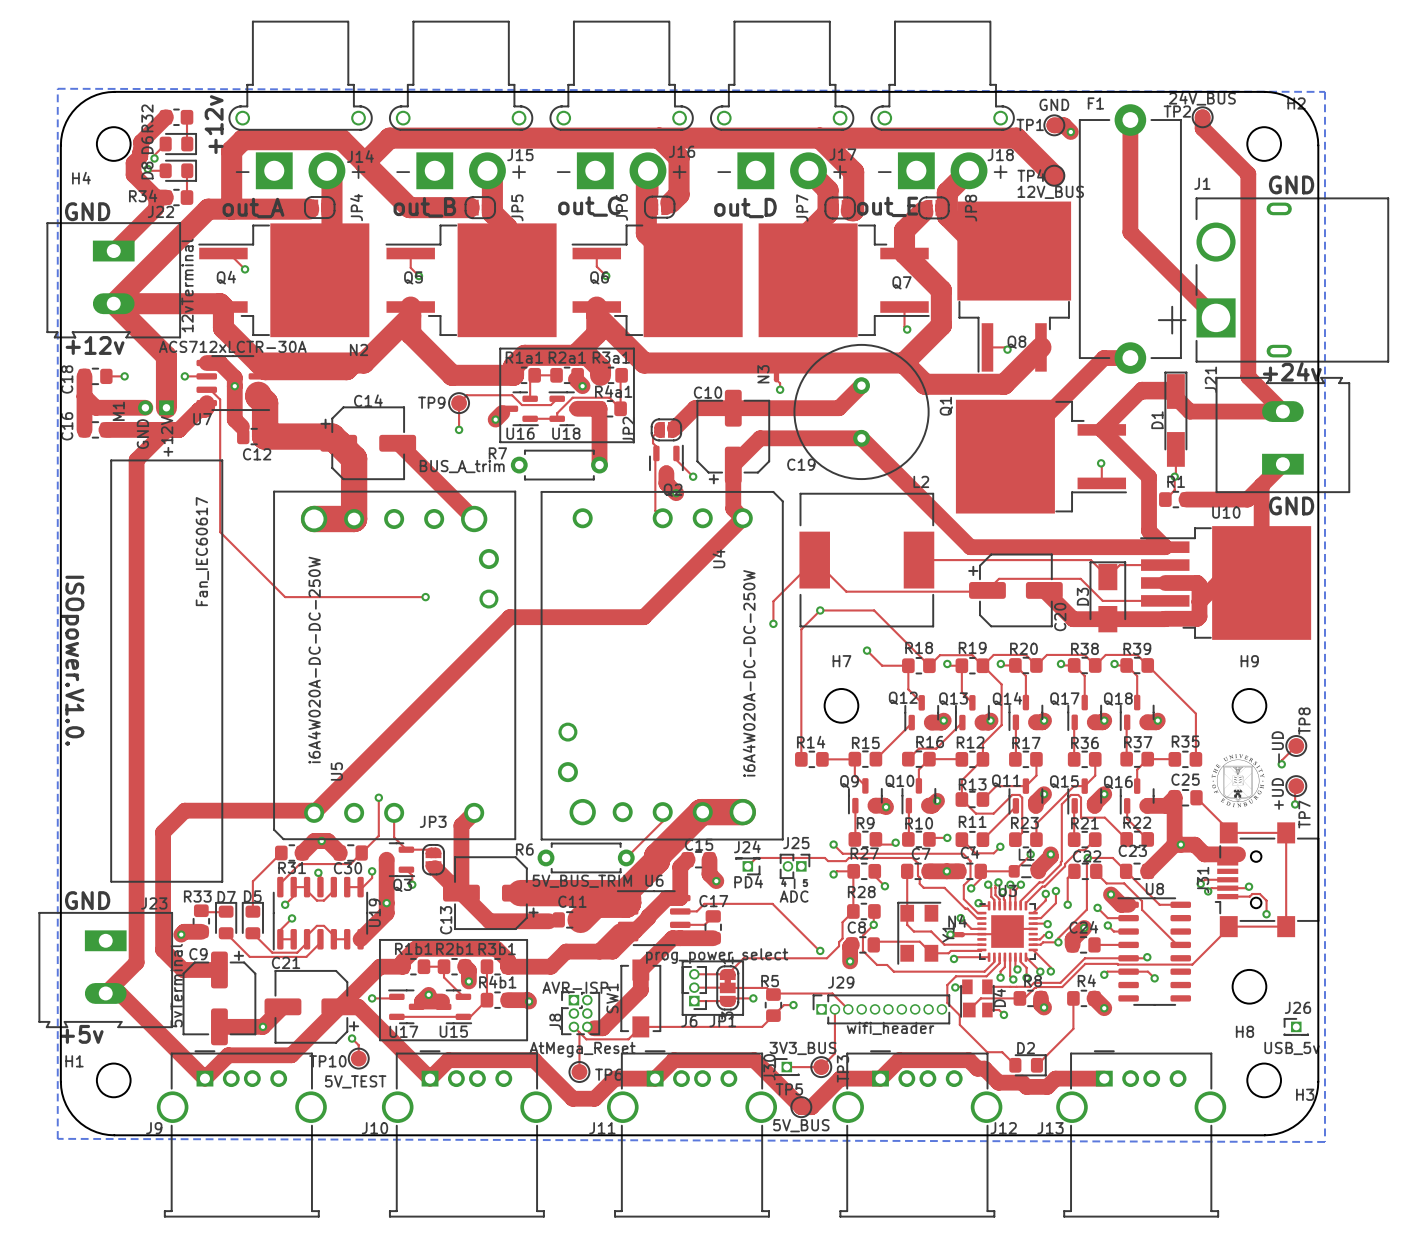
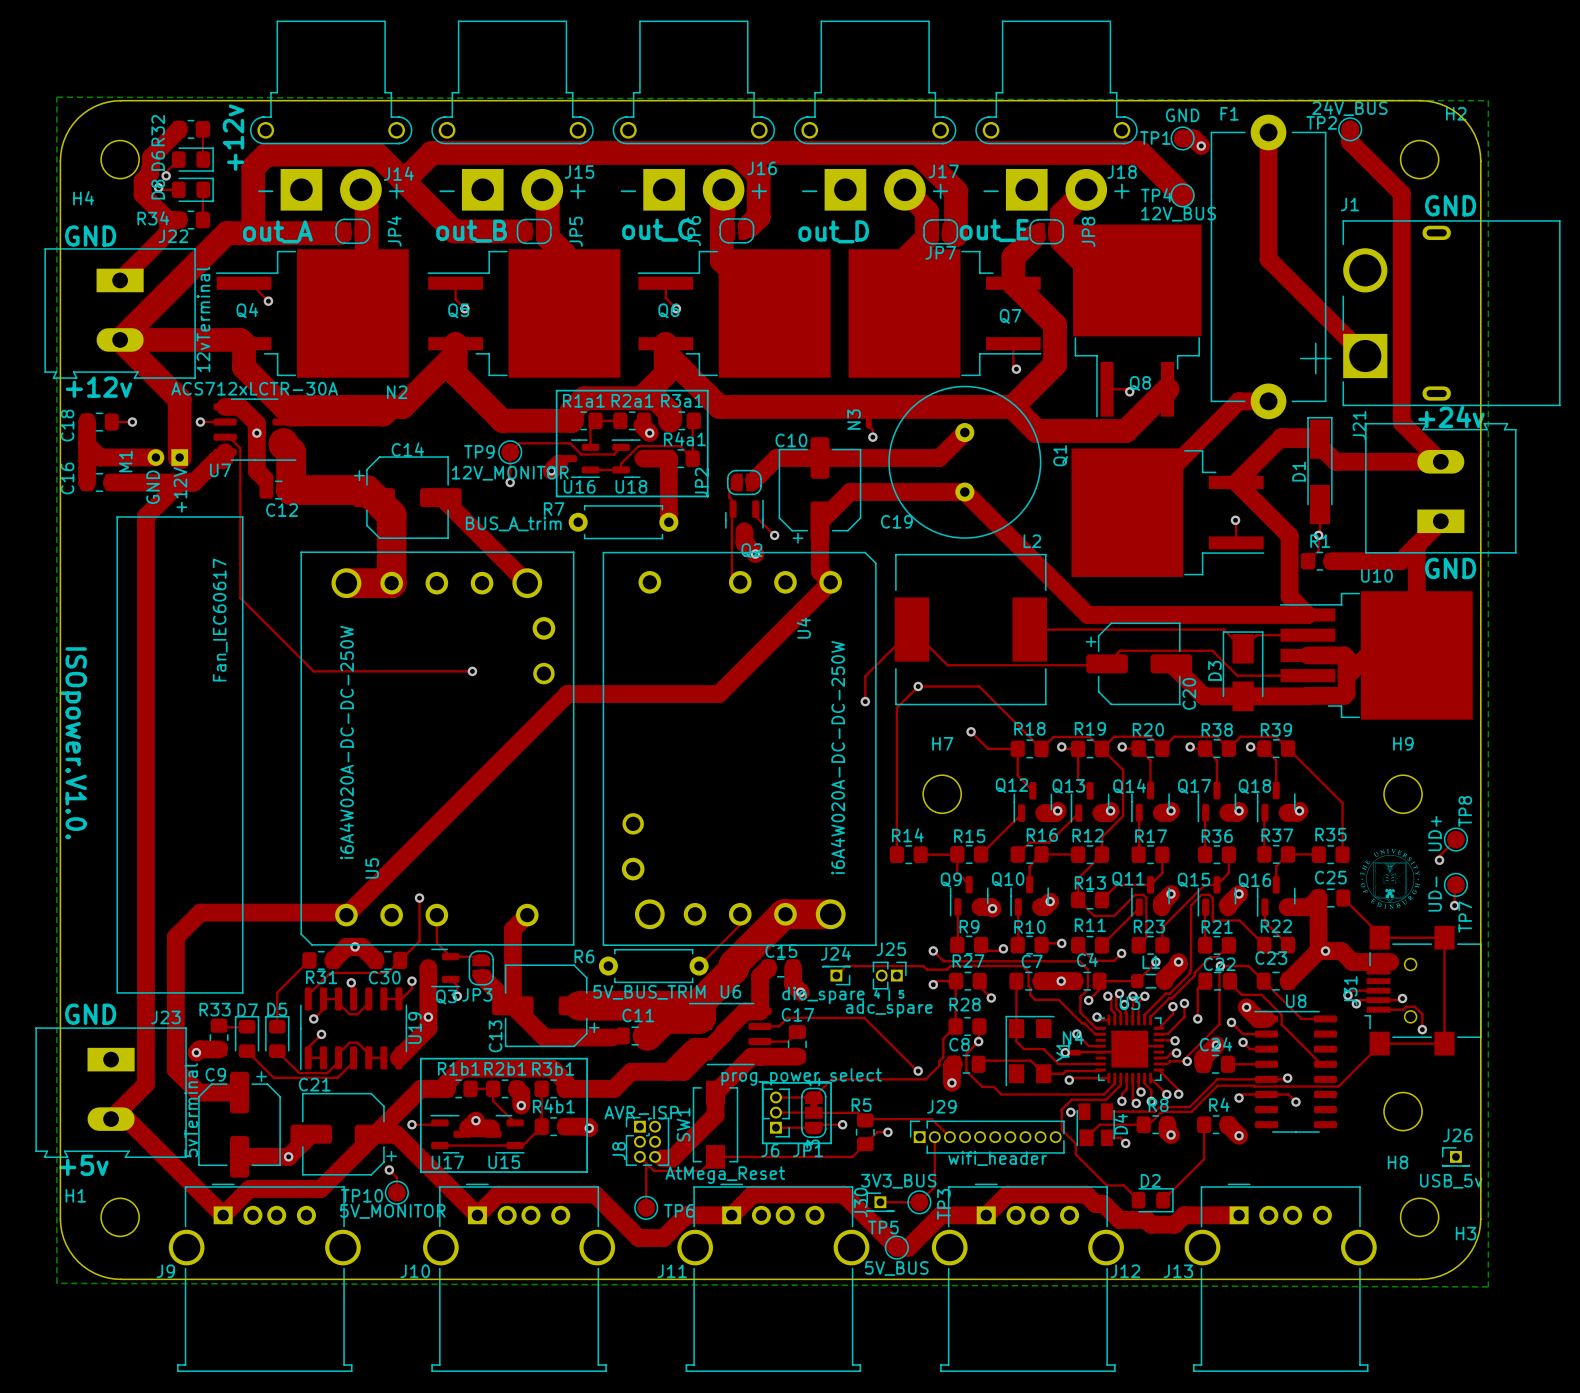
JP7 name rotation: 0° (802, 207) -> 90° clockwise (940, 252)
JP7 name position: JP7 (802, 207) -> JP7 (940, 252)
TP9 value: none -> 12V_MONITOR (510, 473)
TP8 value: -UD (1277, 747) -> UD+ (1435, 833)
TP7 value: +UD (1277, 793) -> UD- (1435, 894)
JP3 name position: JP3 (433, 821) -> JP3 (477, 994)
J24 value: PD4 (748, 881) -> dio_spare (823, 995)
J25 value: ADC (794, 896) -> adc_spare (889, 1008)
TP6 value position: AtMega_Reset (582, 1049) -> AtMega_Reset (725, 1175)
TP10 value: 5V_TEST (355, 1081) -> 5V_MONITOR (392, 1211)

